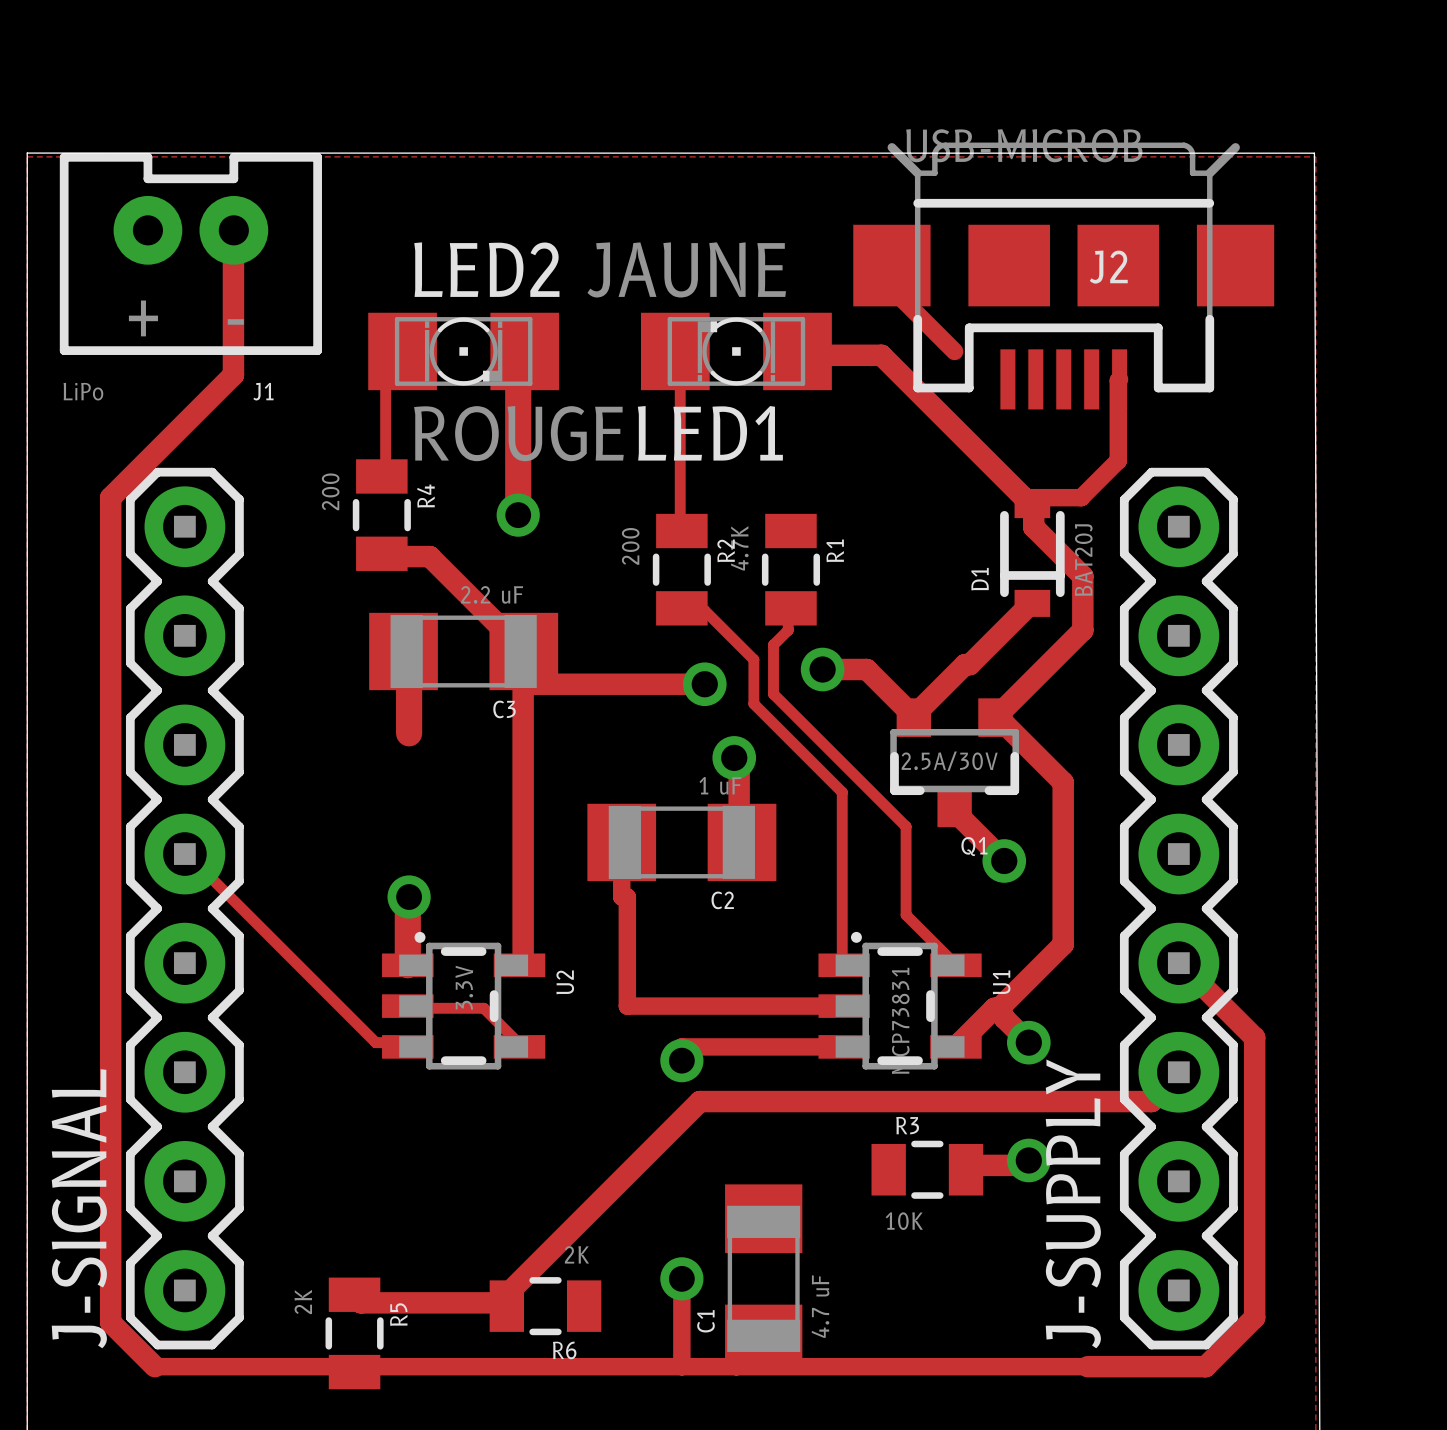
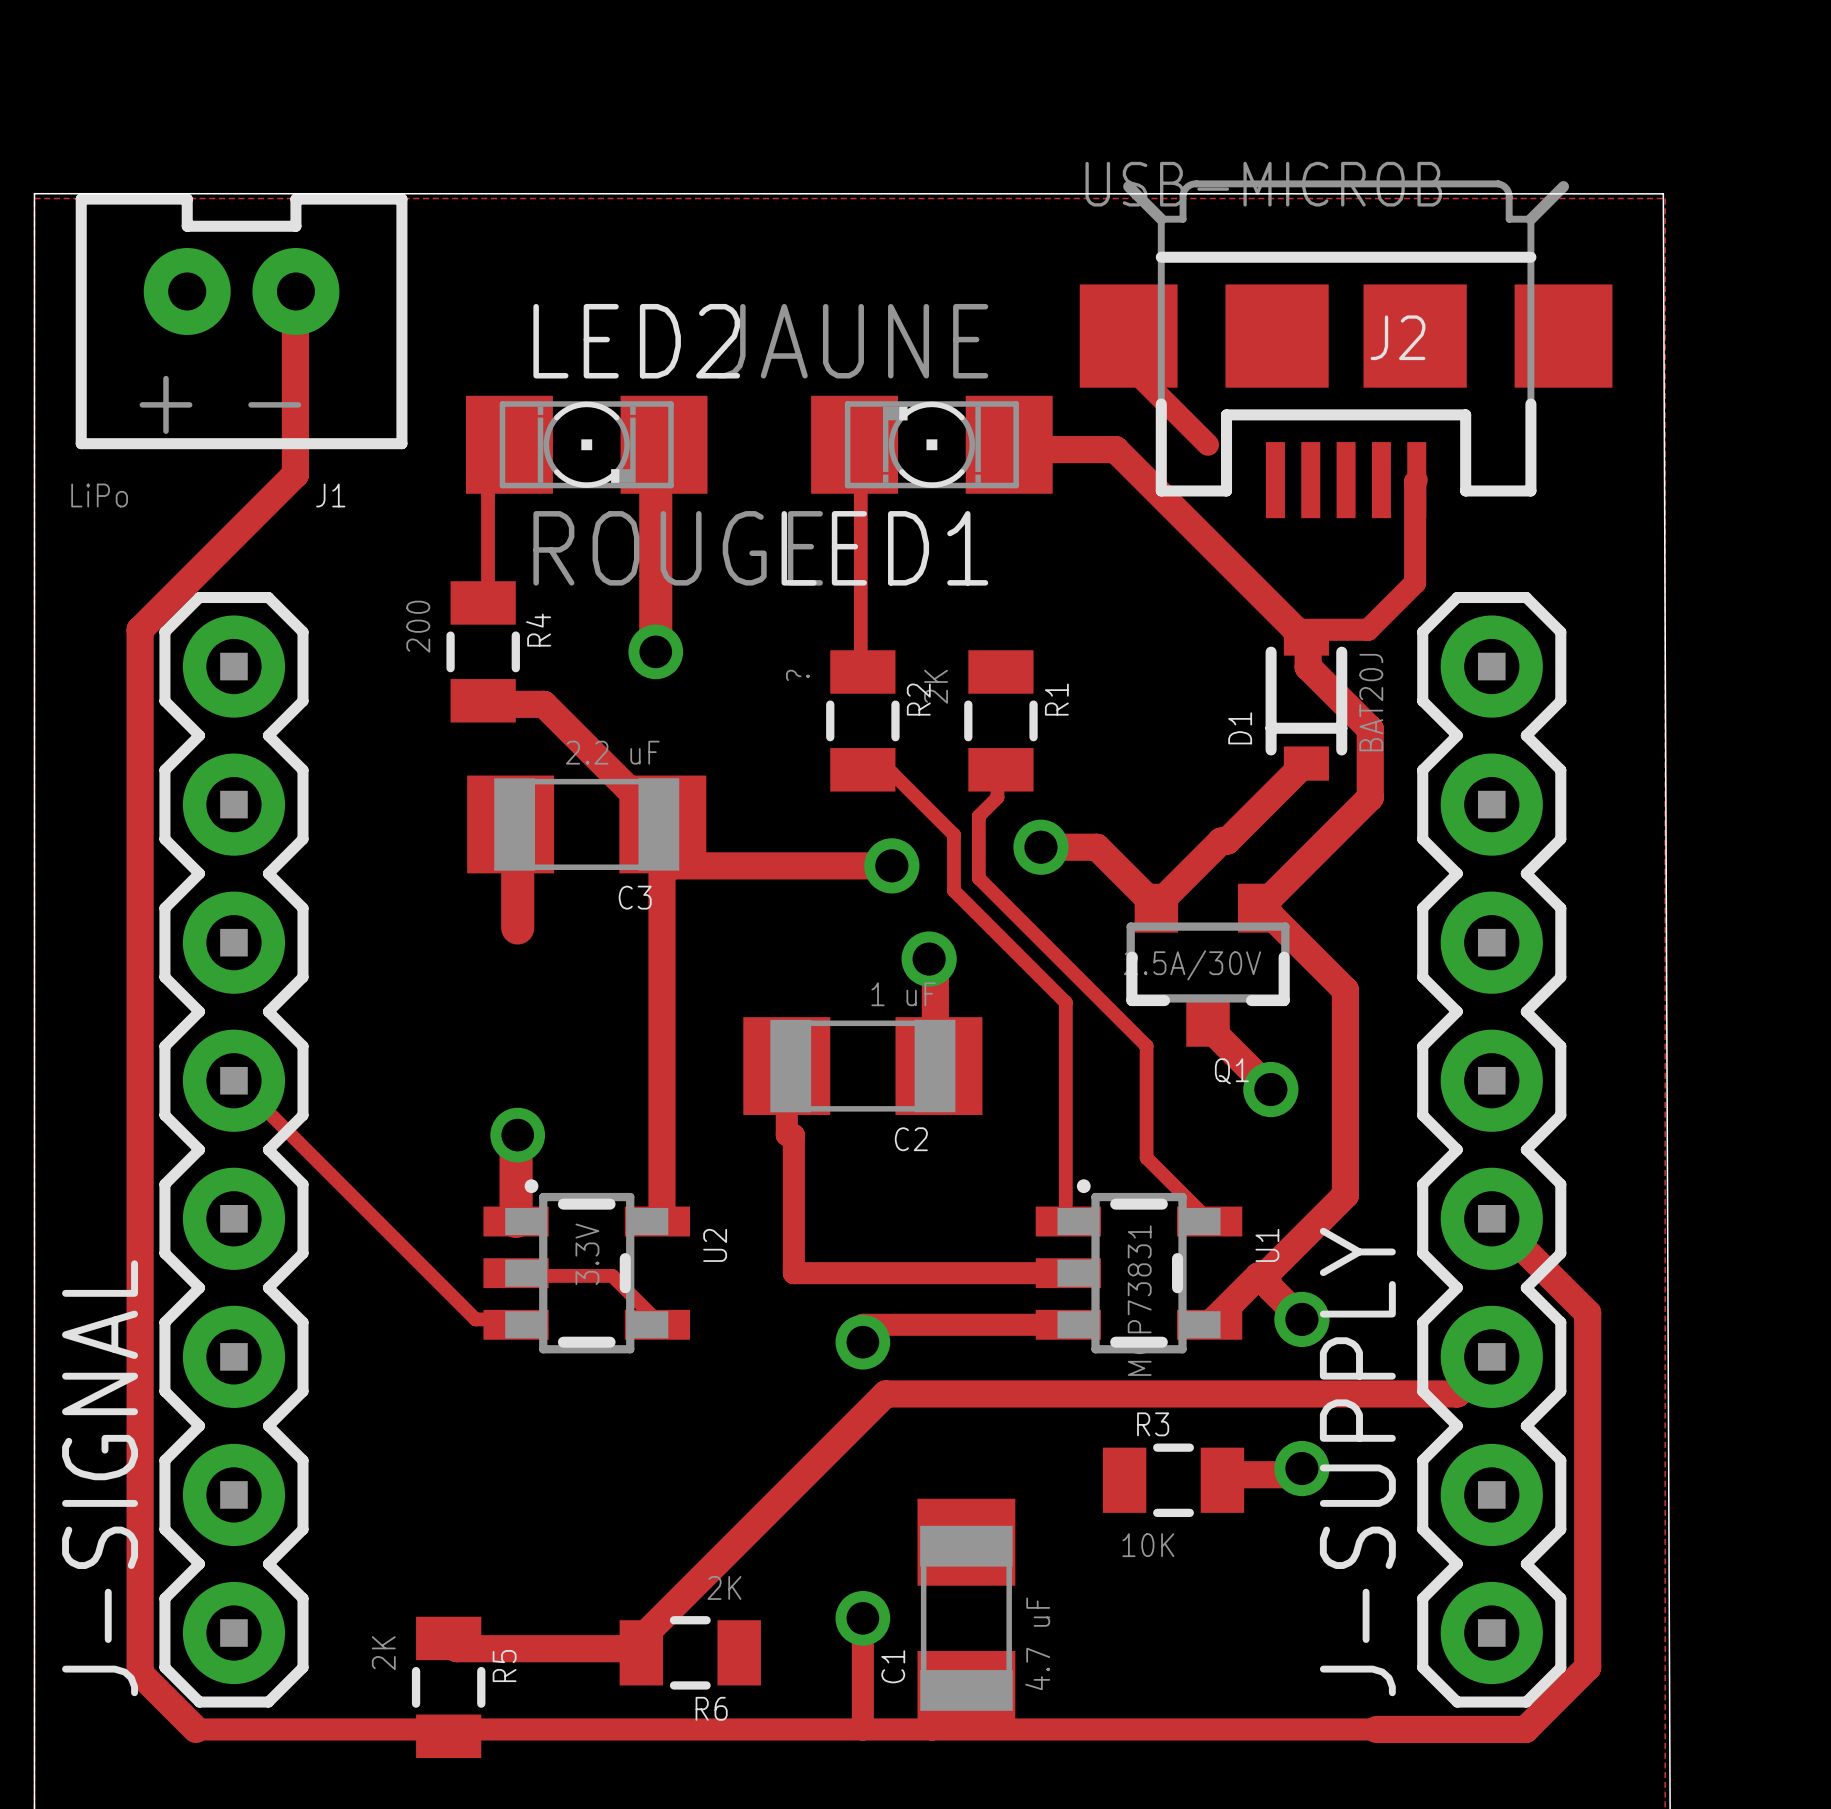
R2 value: 200 (630, 546) -> ? (797, 675)
R1 value: 4.7K (739, 548) -> 2K (936, 686)

